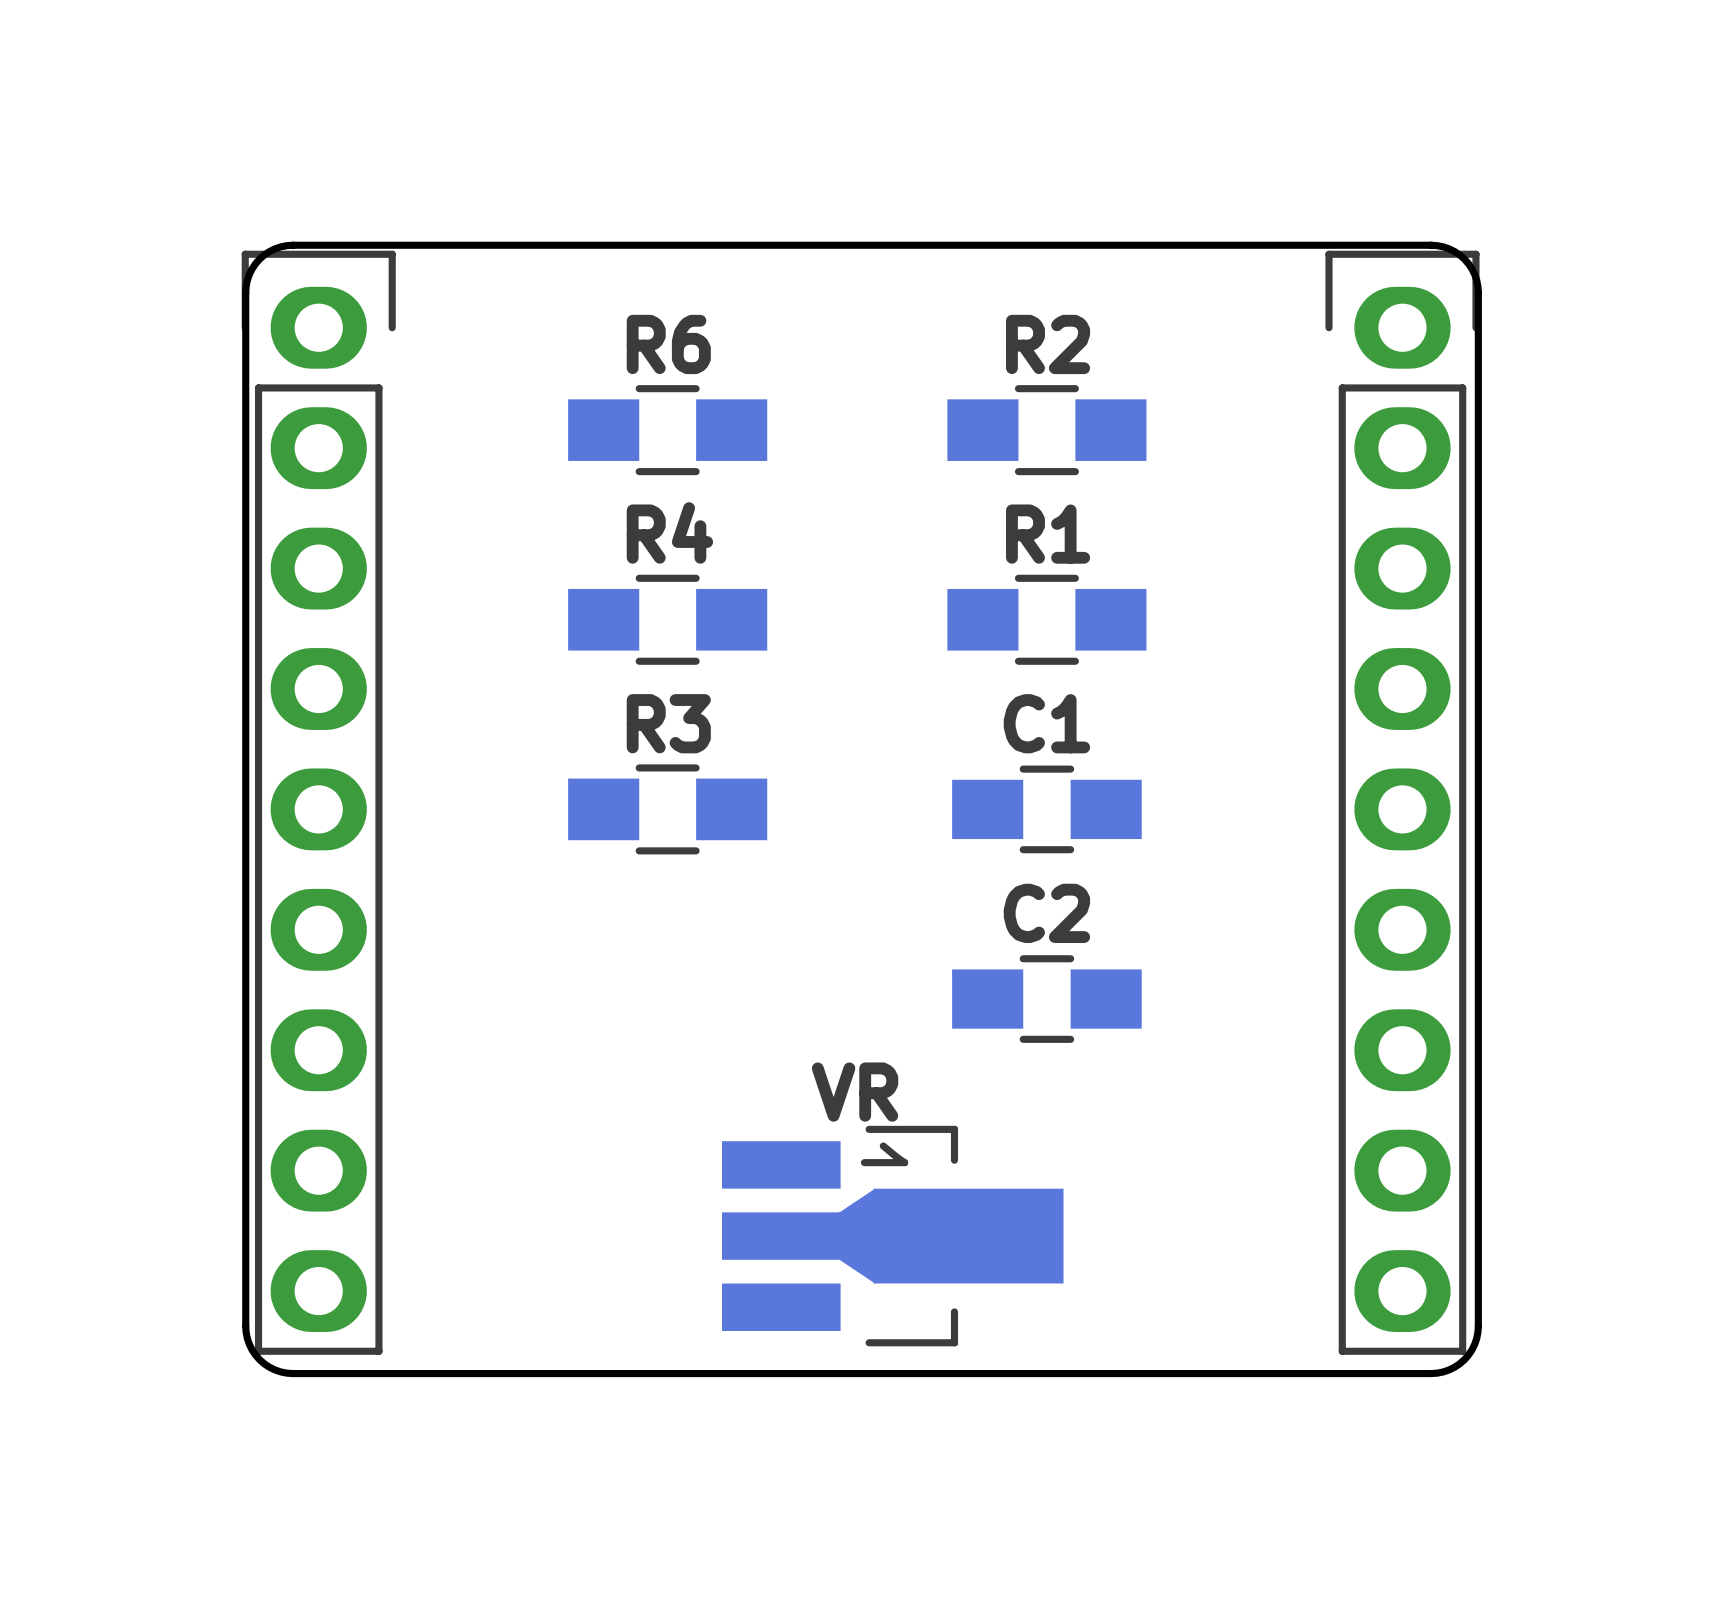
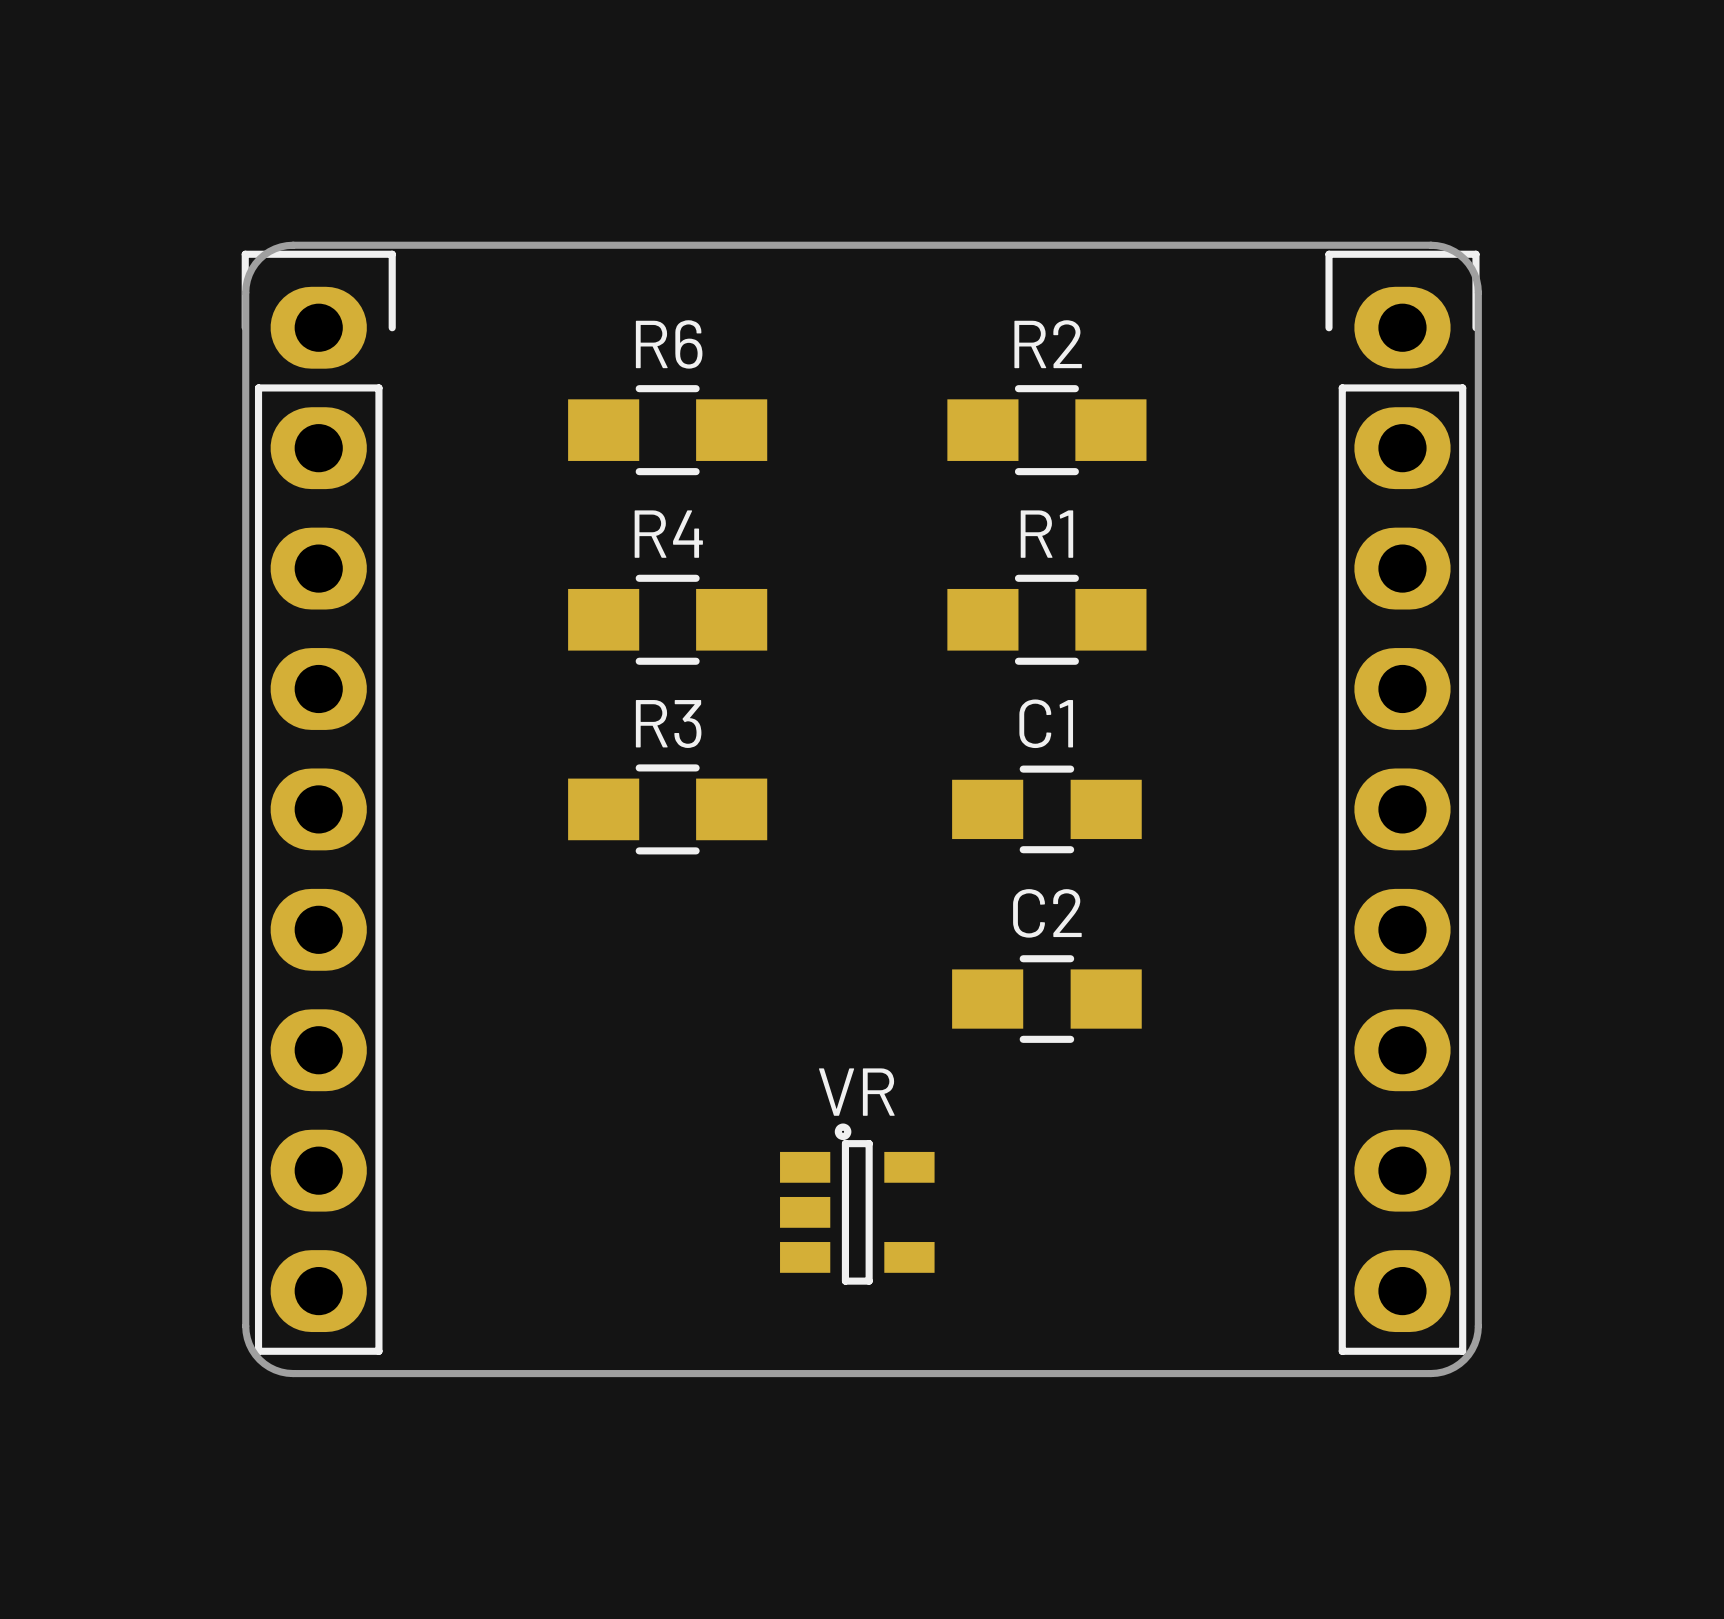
part: none -> (857, 1204)
part: (892, 1236) -> none

